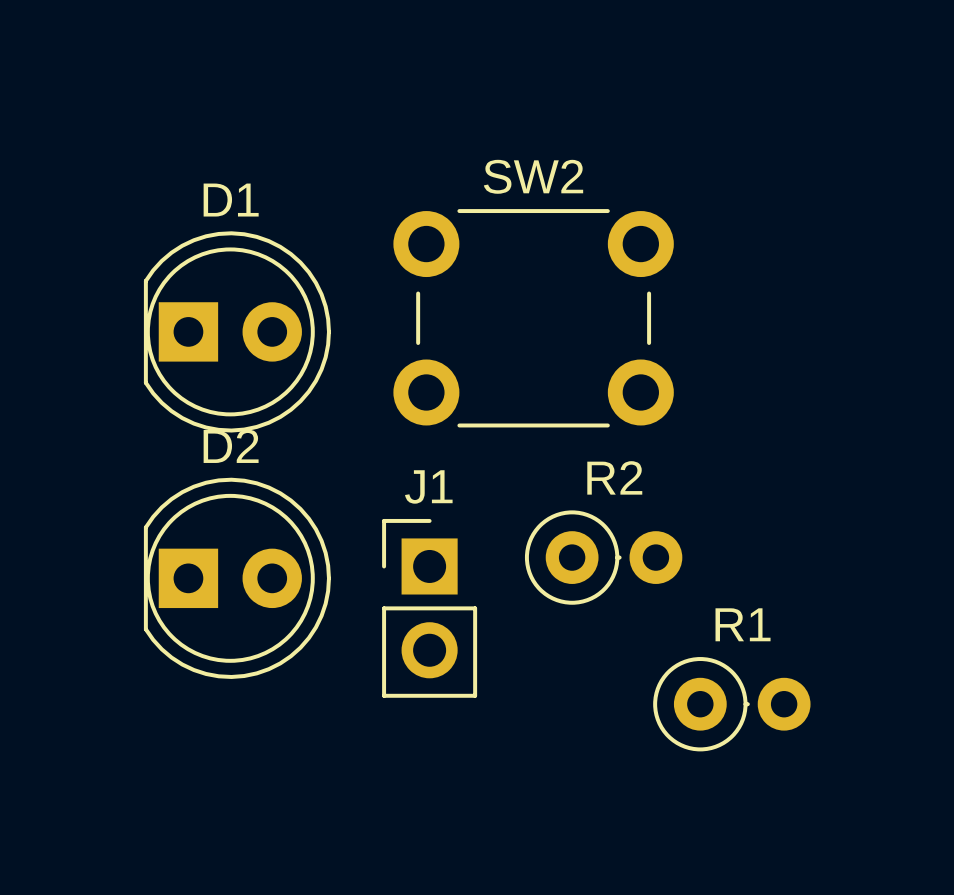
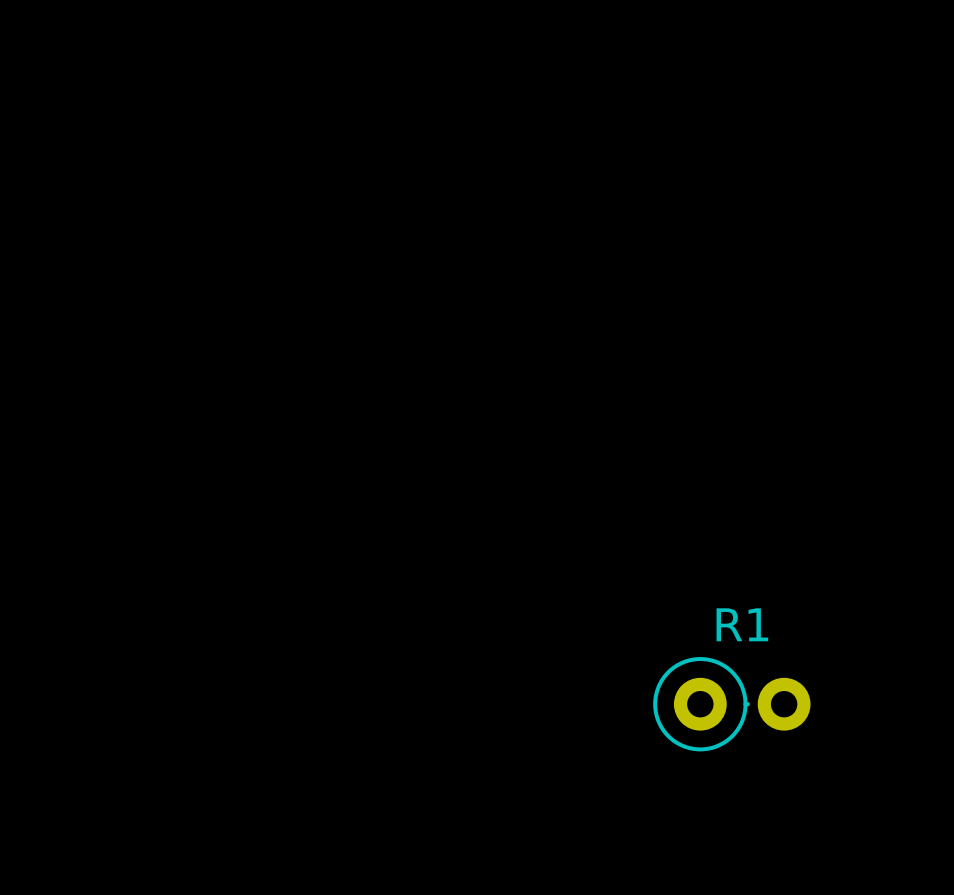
SW2: (533, 318) -> none
D1: (237, 331) -> none
R2: (603, 557) -> none
D2: (237, 578) -> none
J1: (429, 608) -> none

